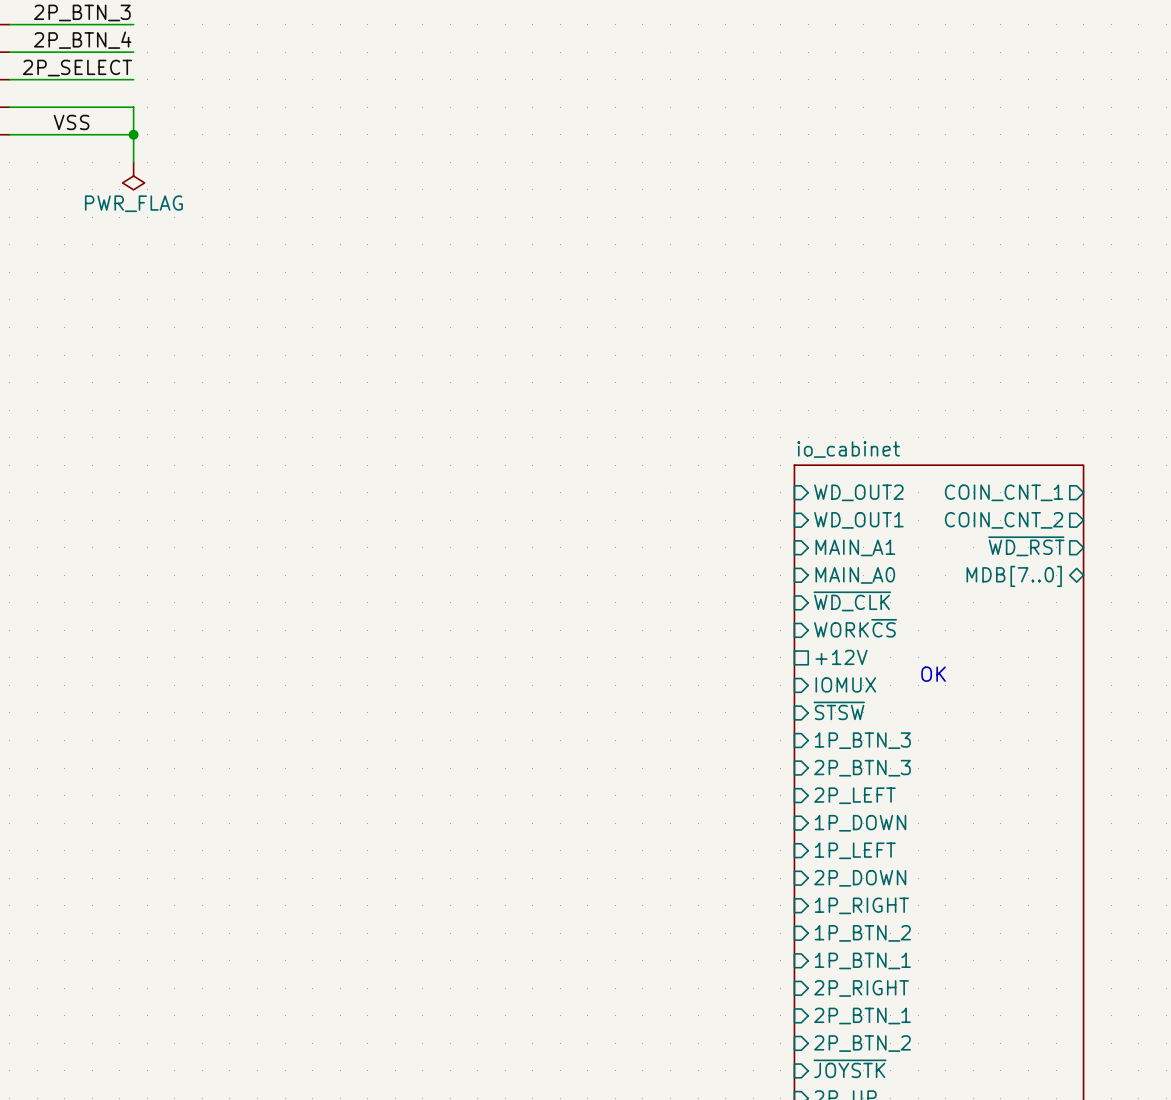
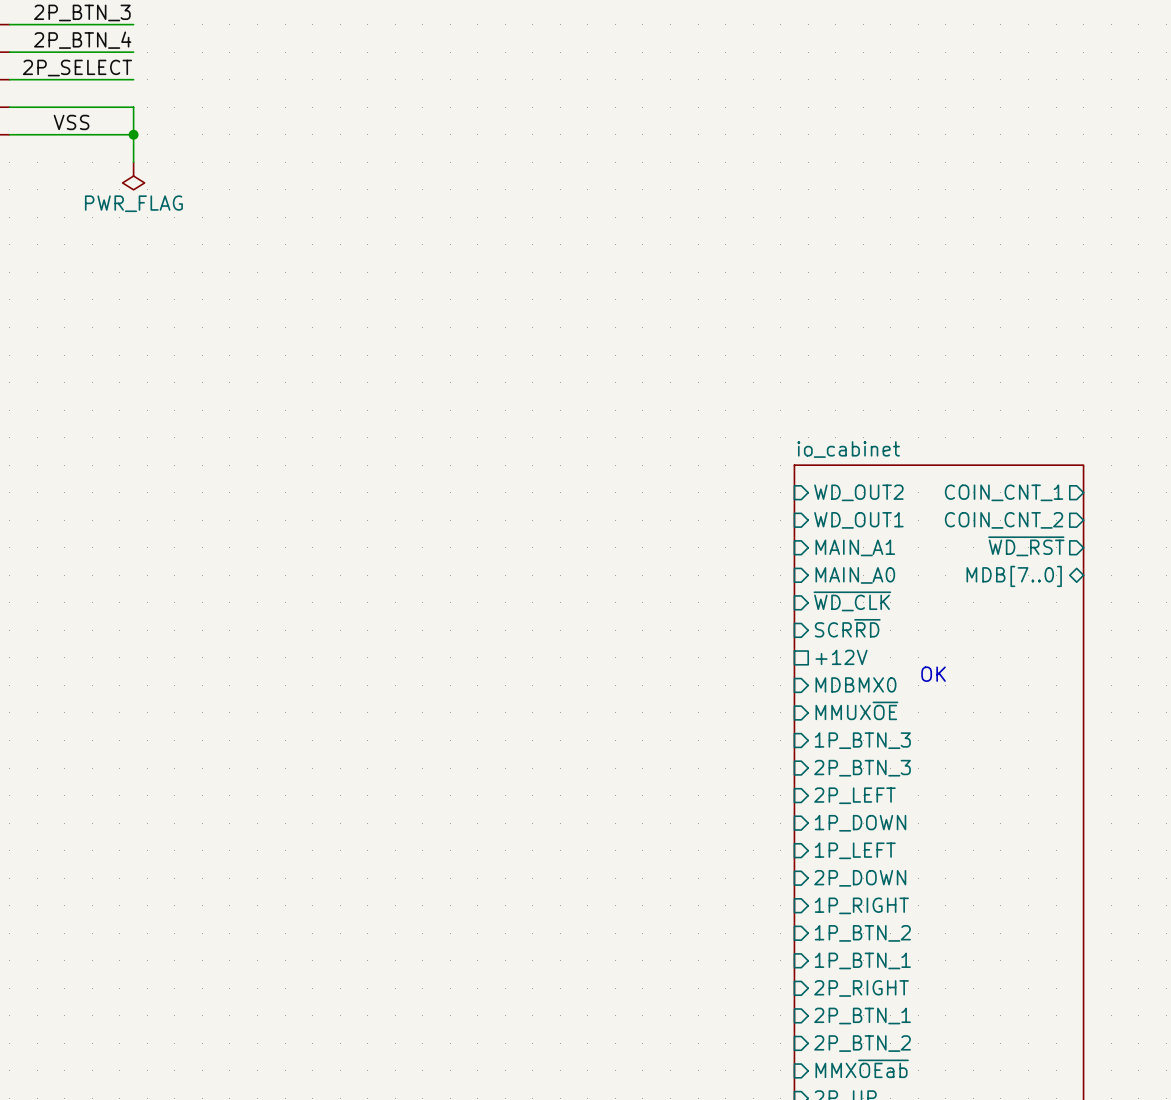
sheet pin: WORK~{CS} (855, 628) -> SCR~{RD} (847, 628)
sheet pin: IOMUX (845, 684) -> MDBMX0 (855, 684)
sheet pin: ~{STSW} (839, 710) -> MMUX~{OE} (856, 710)
sheet pin: ~{JOYSTK} (850, 1068) -> MMX~{OEab} (862, 1068)

